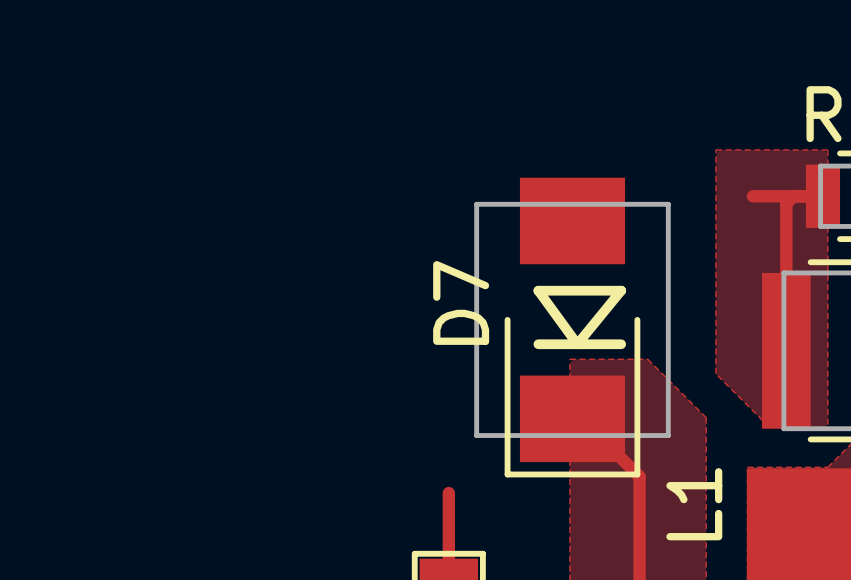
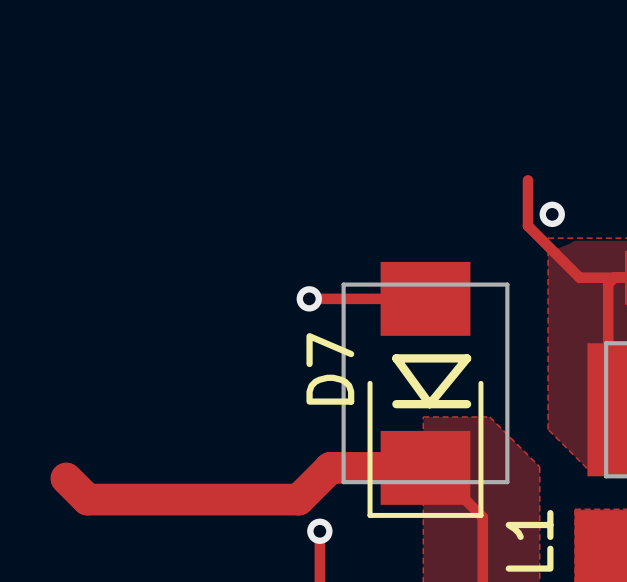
track: none -> (527, 180) (527, 226) (579, 277)
via: none -> (552, 214)
via: none -> (309, 298)
track: none -> (425, 467) (330, 467) (298, 499) (87, 499) (66, 478)
via: none -> (319, 531)

